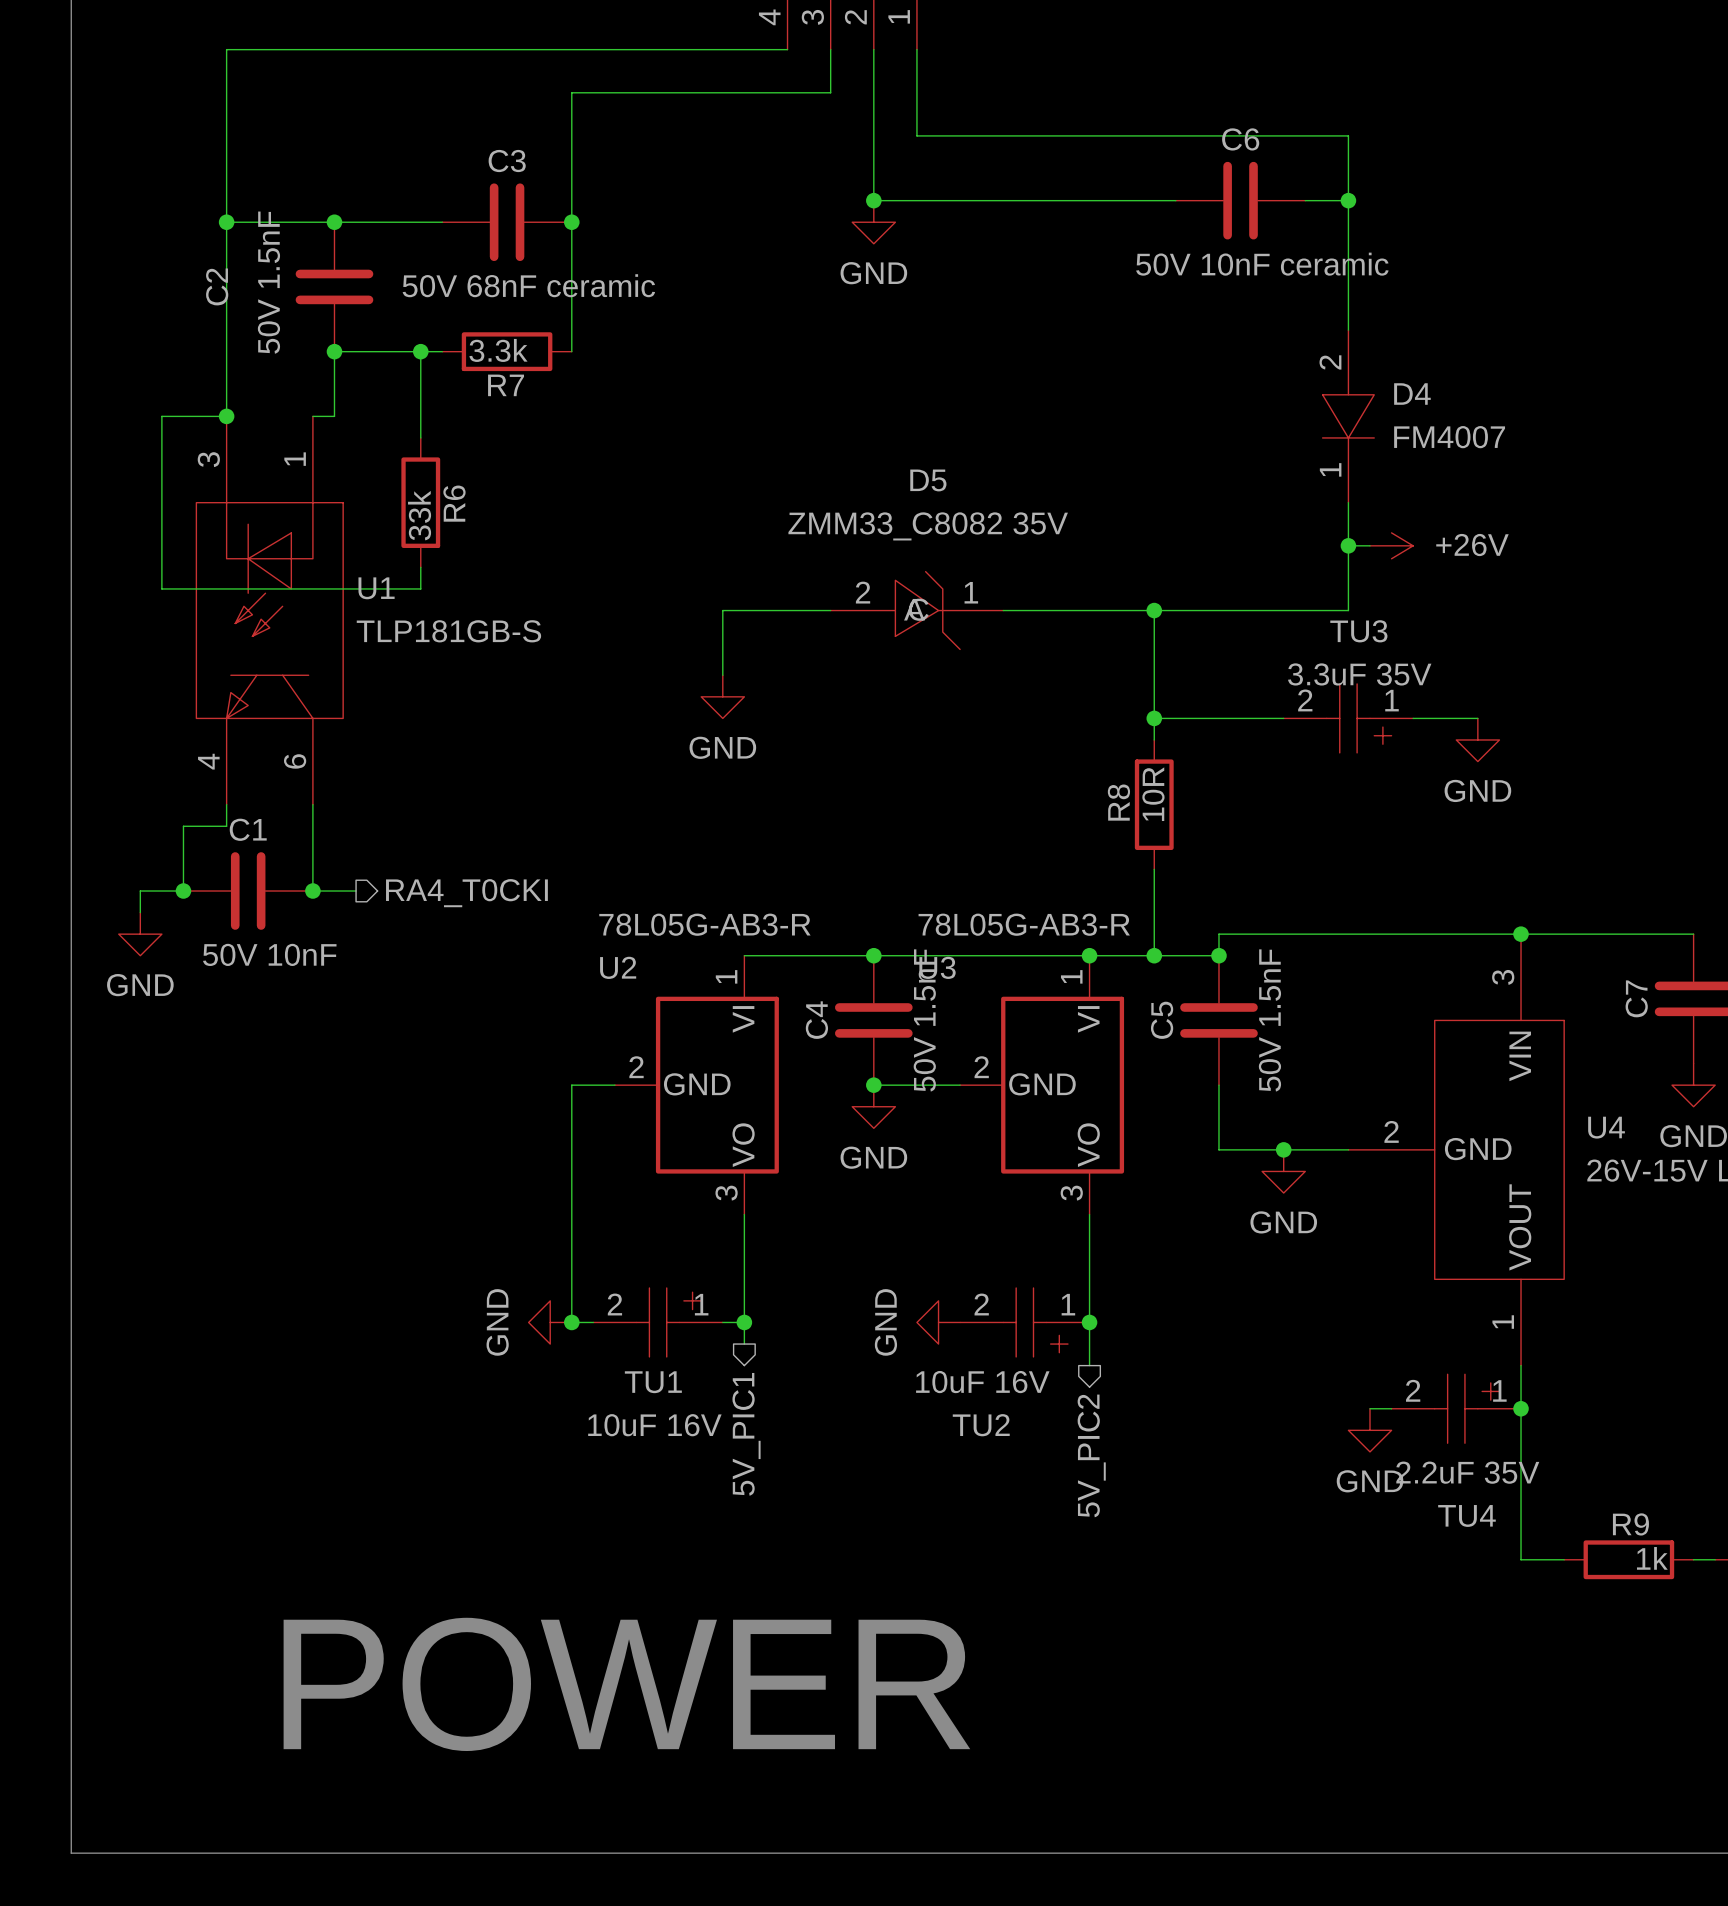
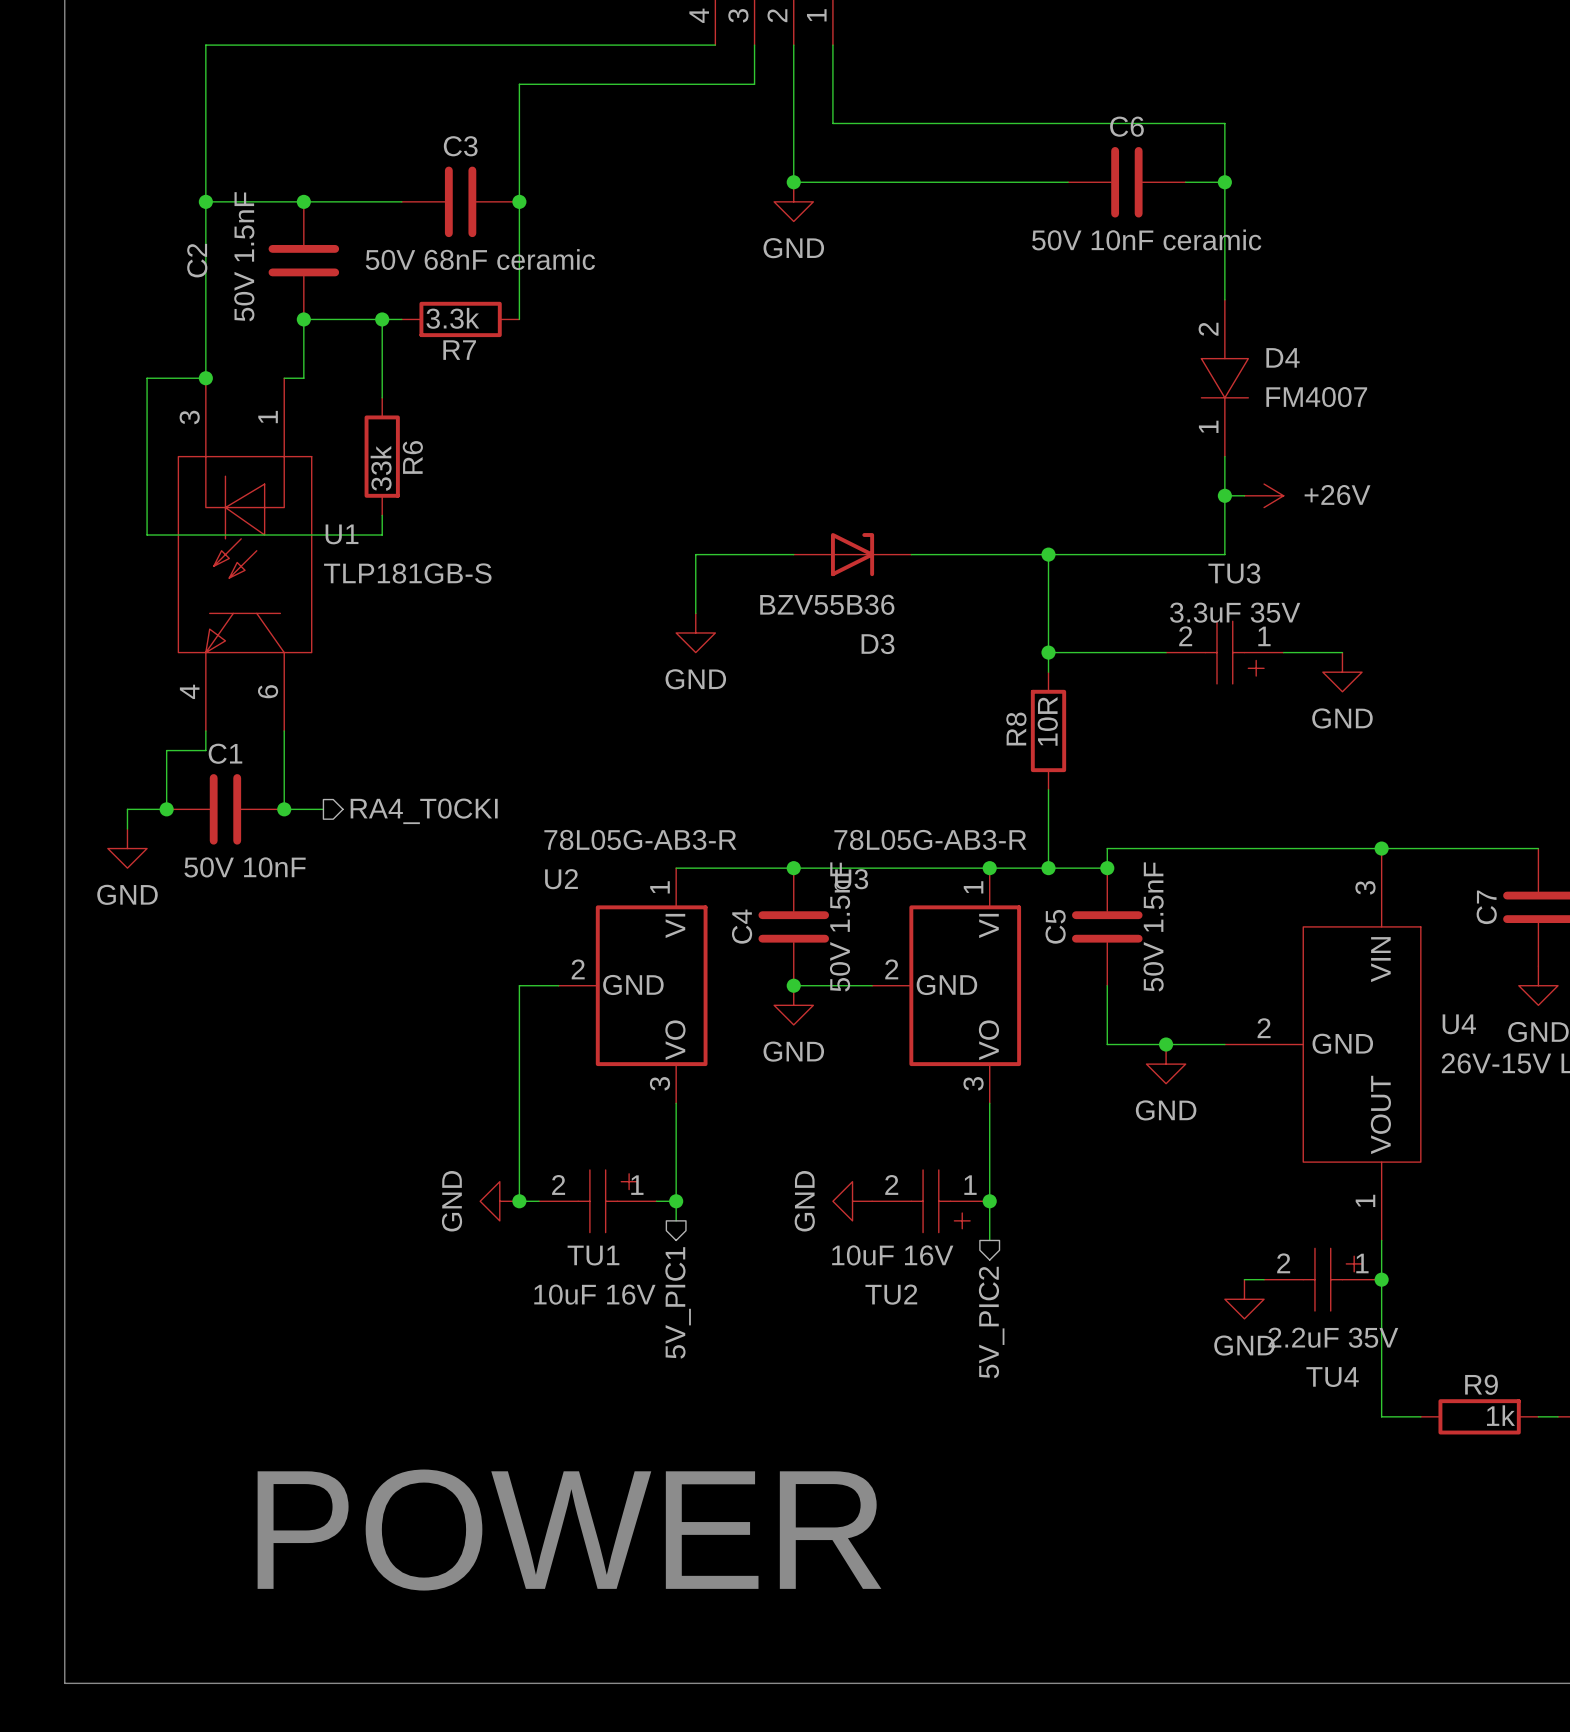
wire: (765, 610) (722, 610) (722, 675) -> (695, 554) (695, 613)
D5: ZMM33_C8082 35V (916, 610) -> none
D3: none -> BZV55B36 (852, 554)
power symbol position: GND (722, 696) -> GND (695, 632)

